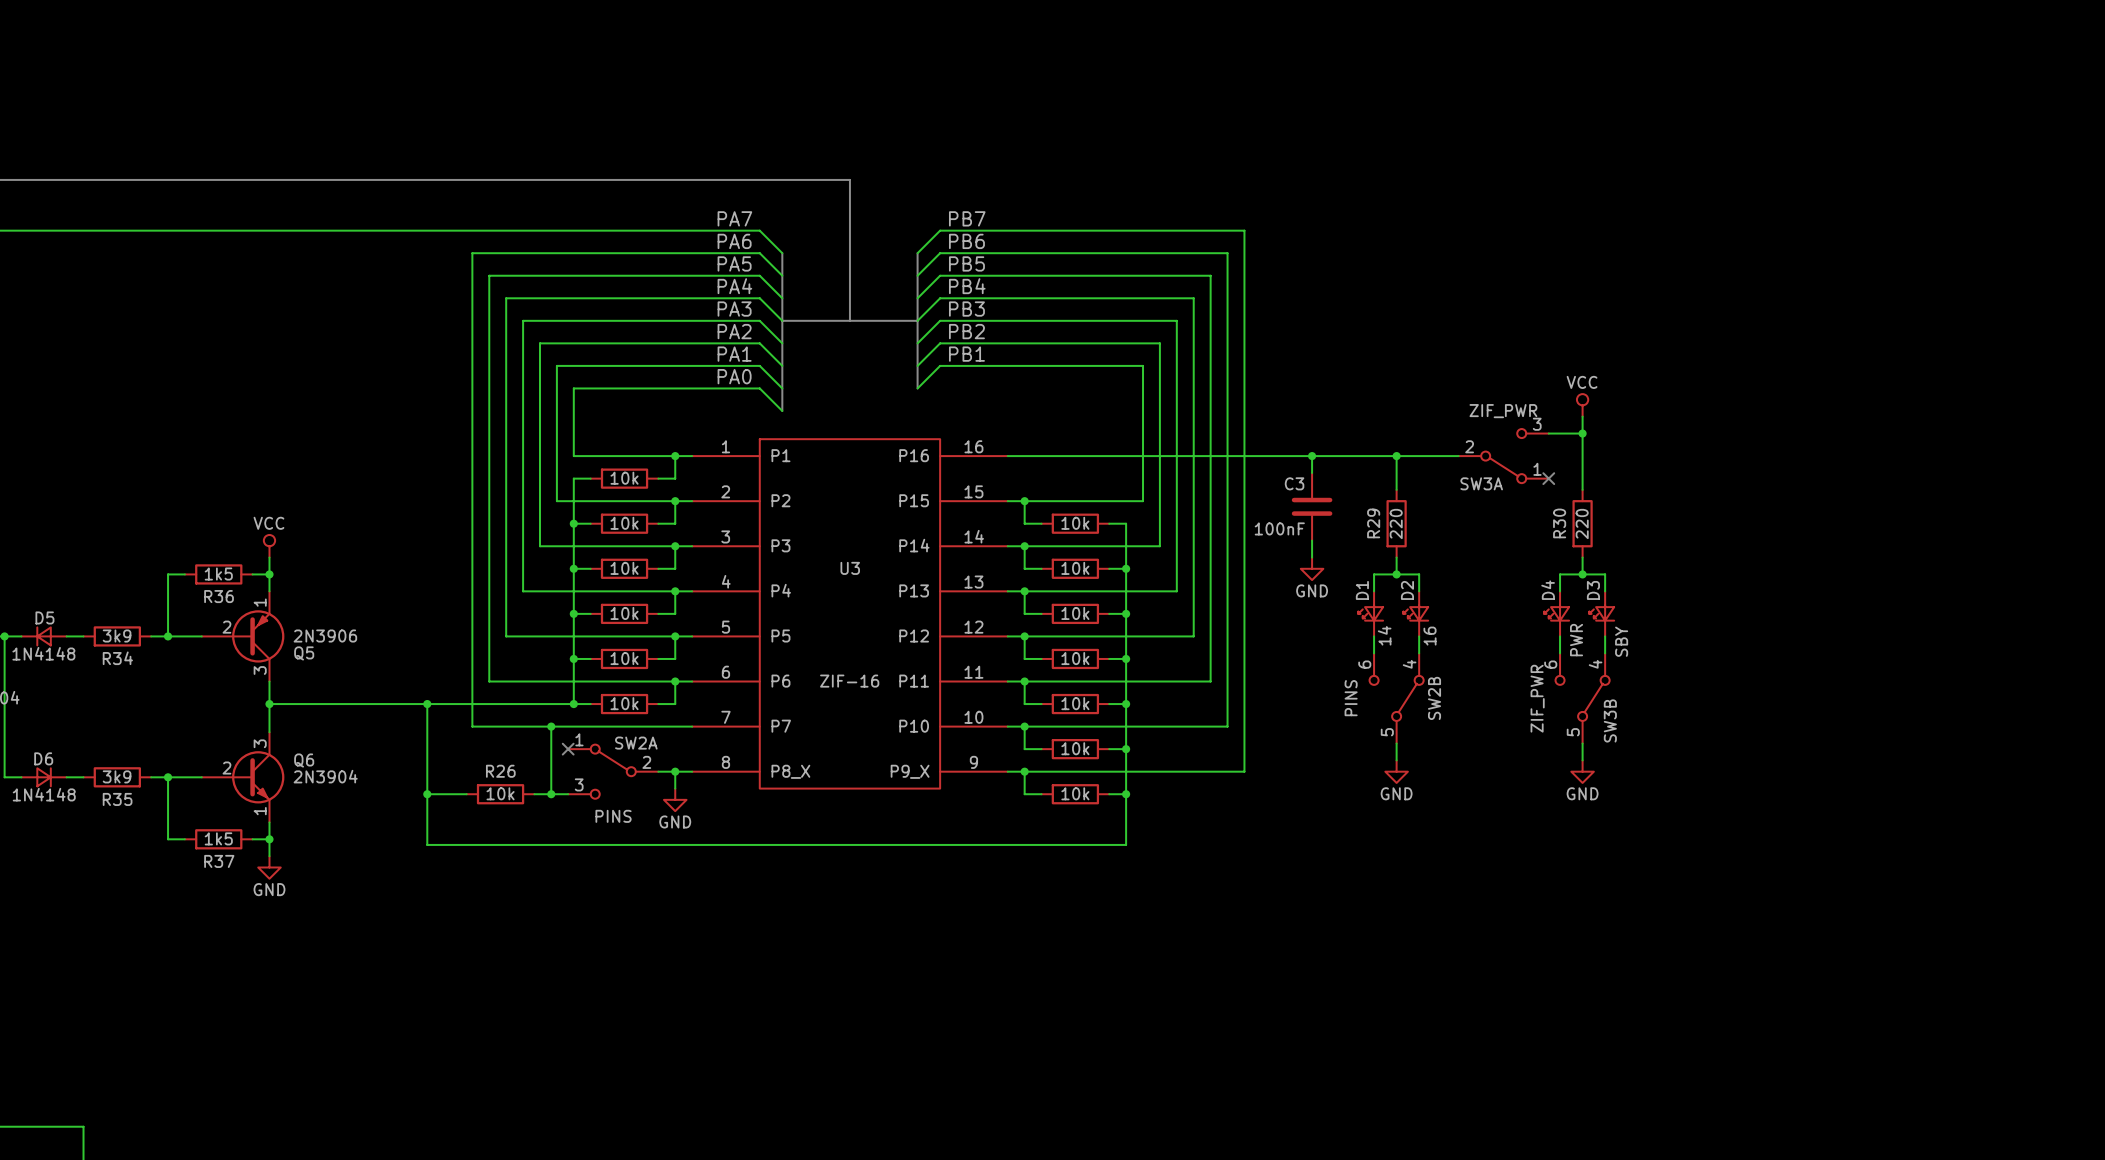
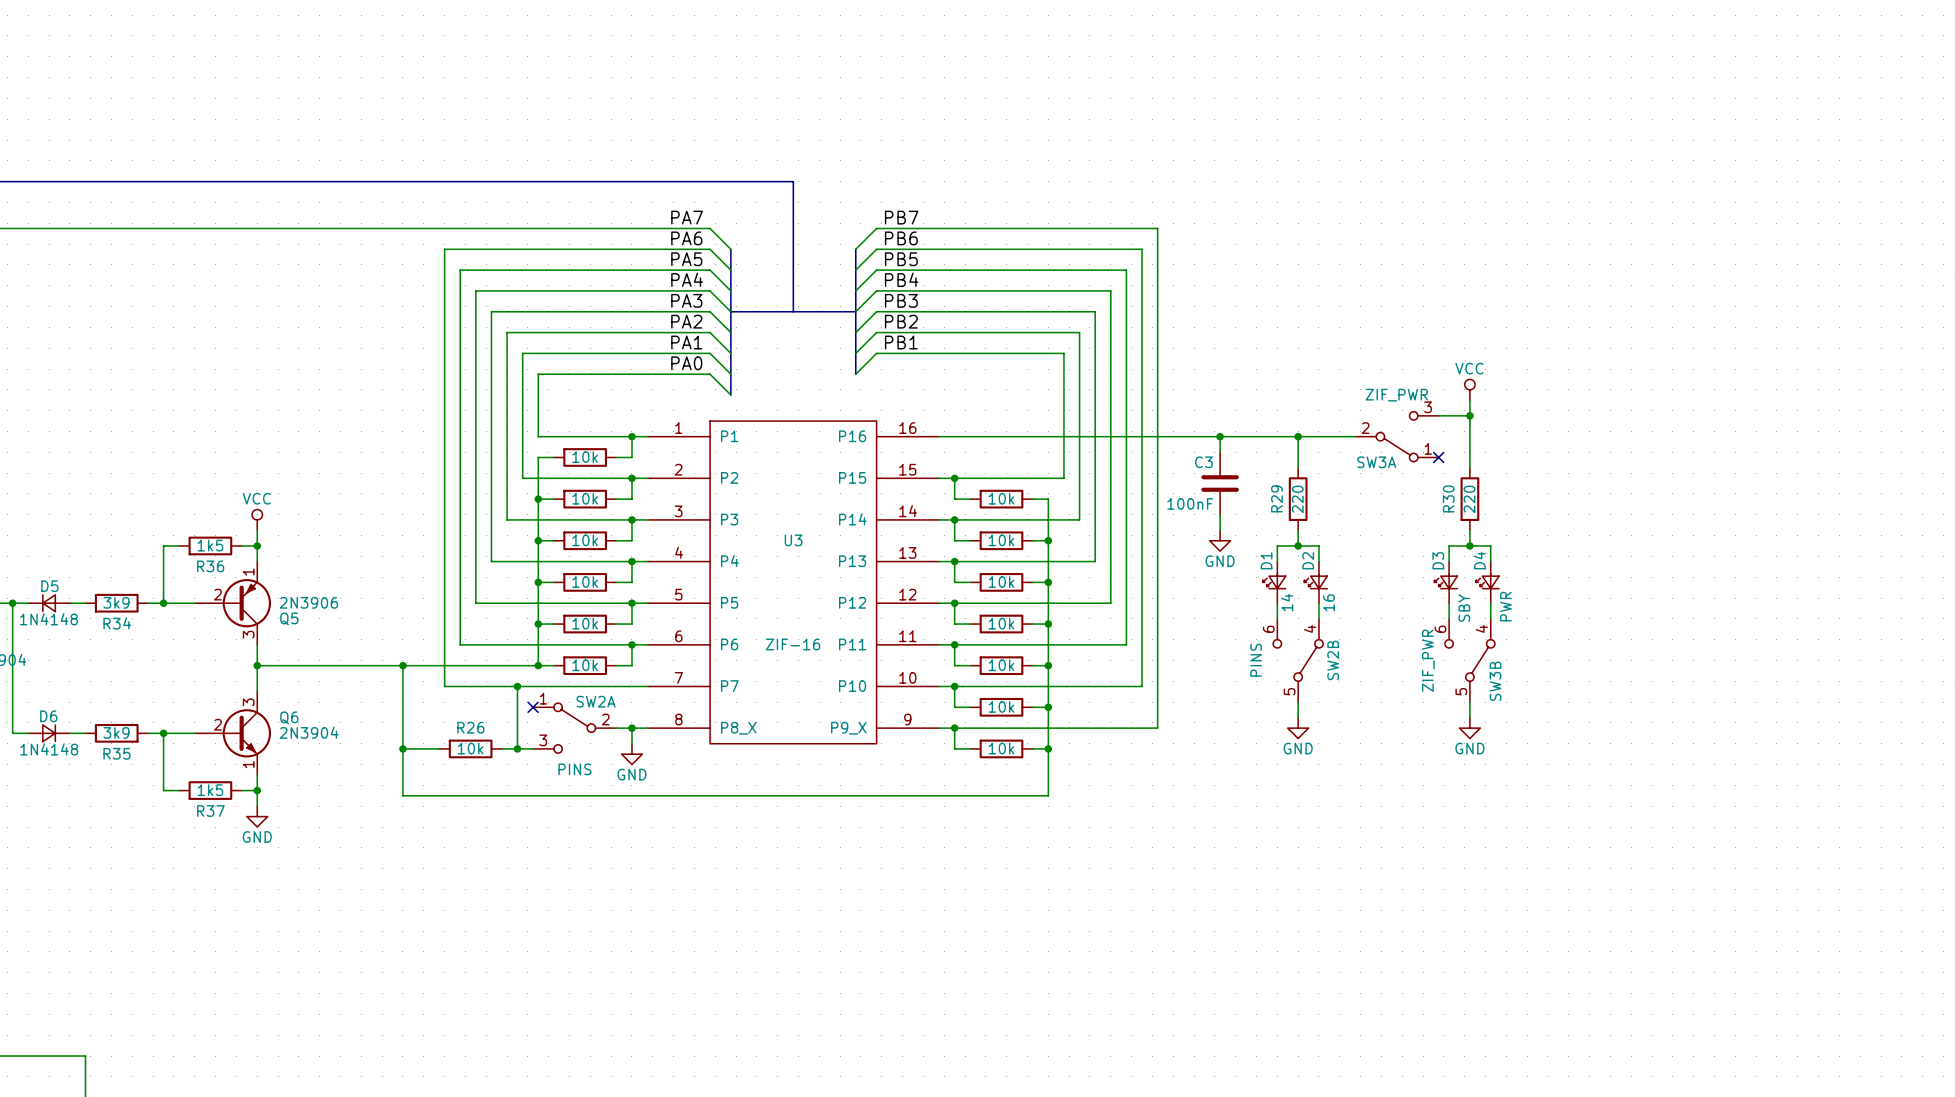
D4 name: D4 (1548, 590) -> D3 (1438, 560)
D3 name: D3 (1593, 590) -> D4 (1479, 560)
D4 value: PWR (1576, 640) -> SBY (1464, 608)
D3 value: SBY (1621, 641) -> PWR (1505, 606)

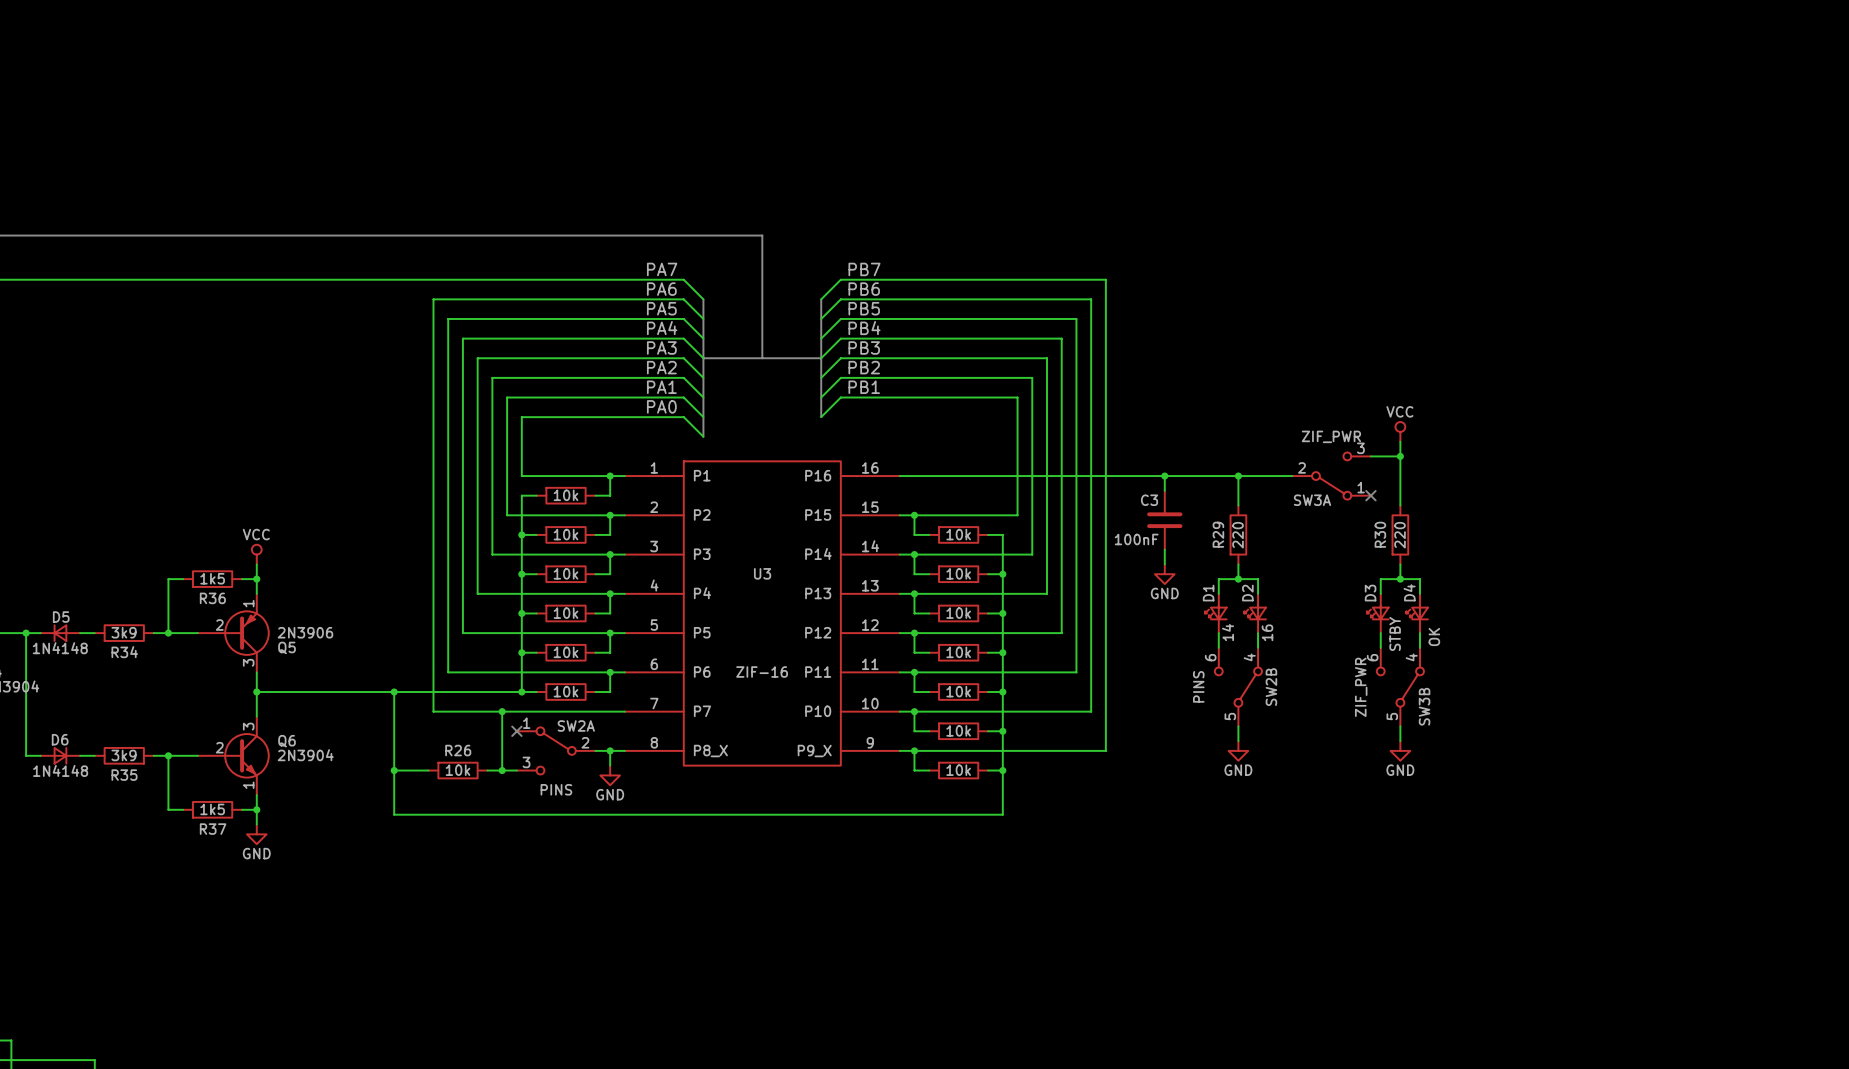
D4 value: PWR (1505, 606) -> OK (1434, 637)
D3 value: SBY (1464, 608) -> STBY (1395, 633)

